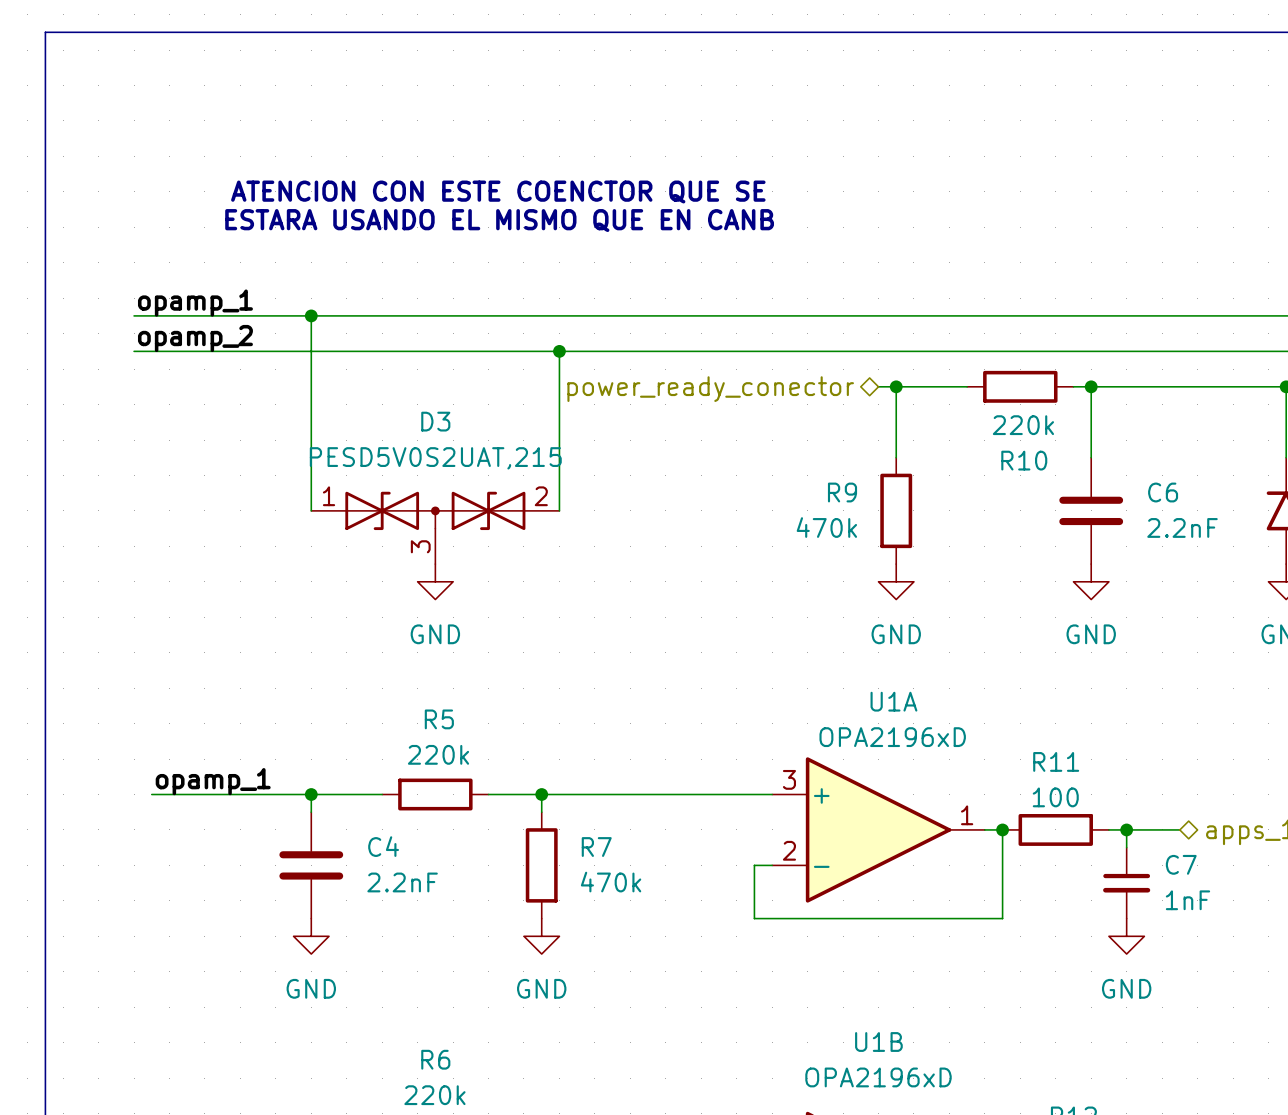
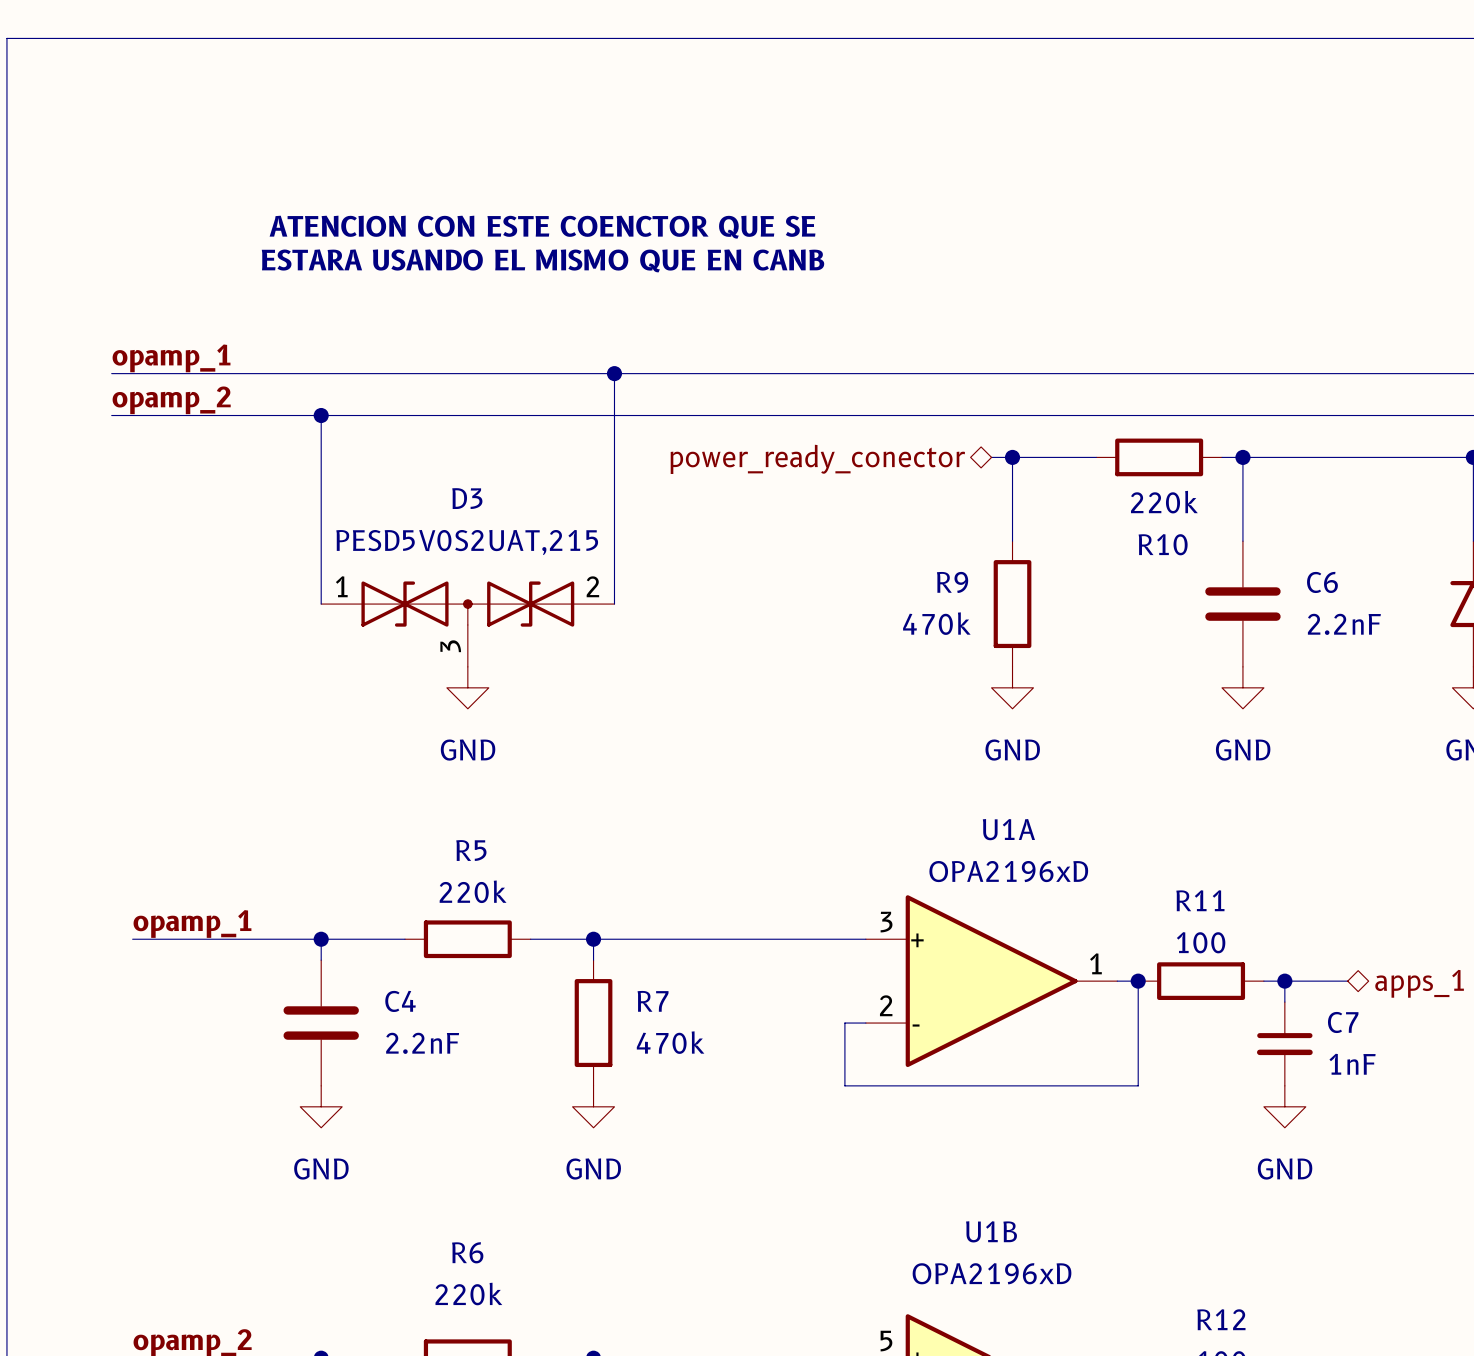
wire: (311, 315) (311, 351) -> (614, 373) (614, 415)
junction position: (311, 315) -> (321, 415)
junction position: (559, 351) -> (614, 373)

